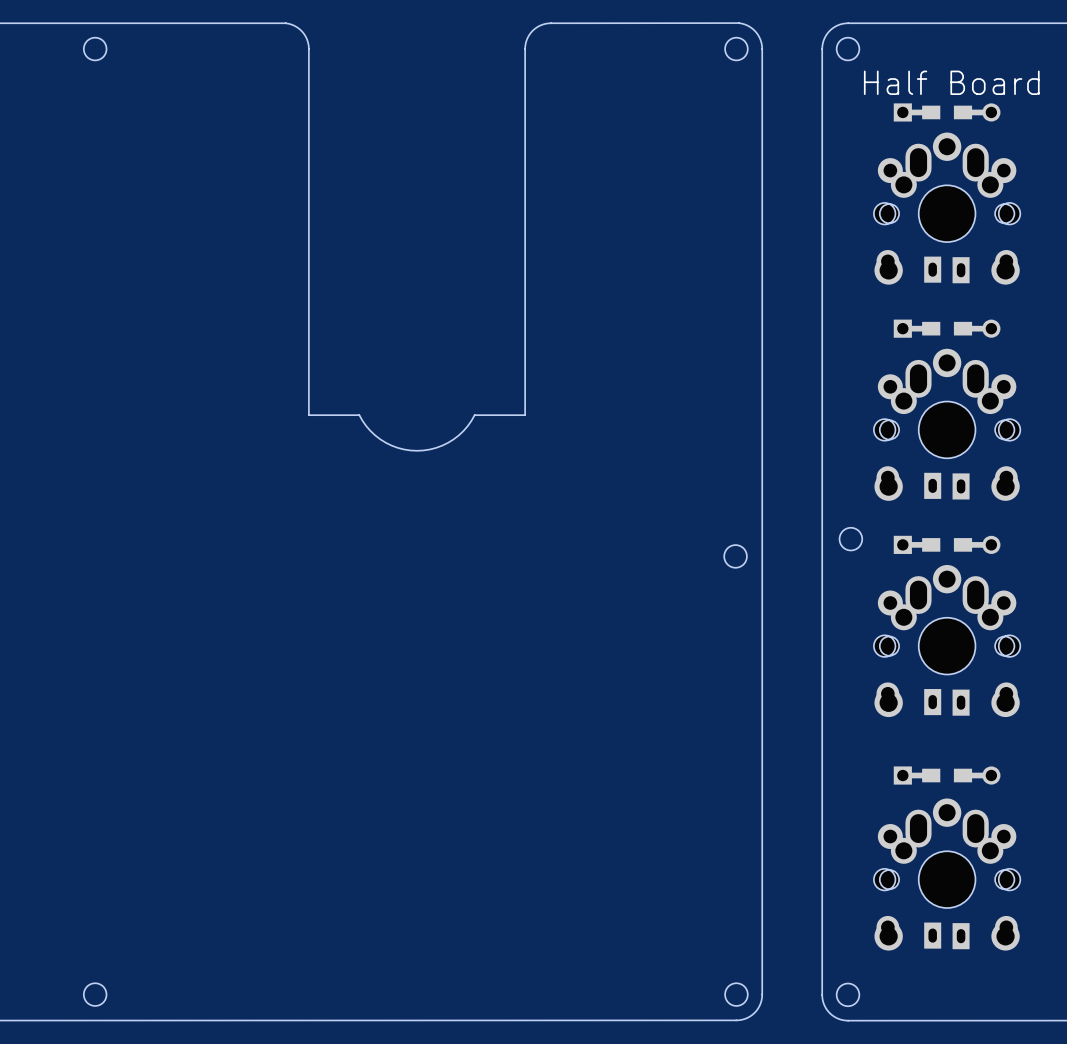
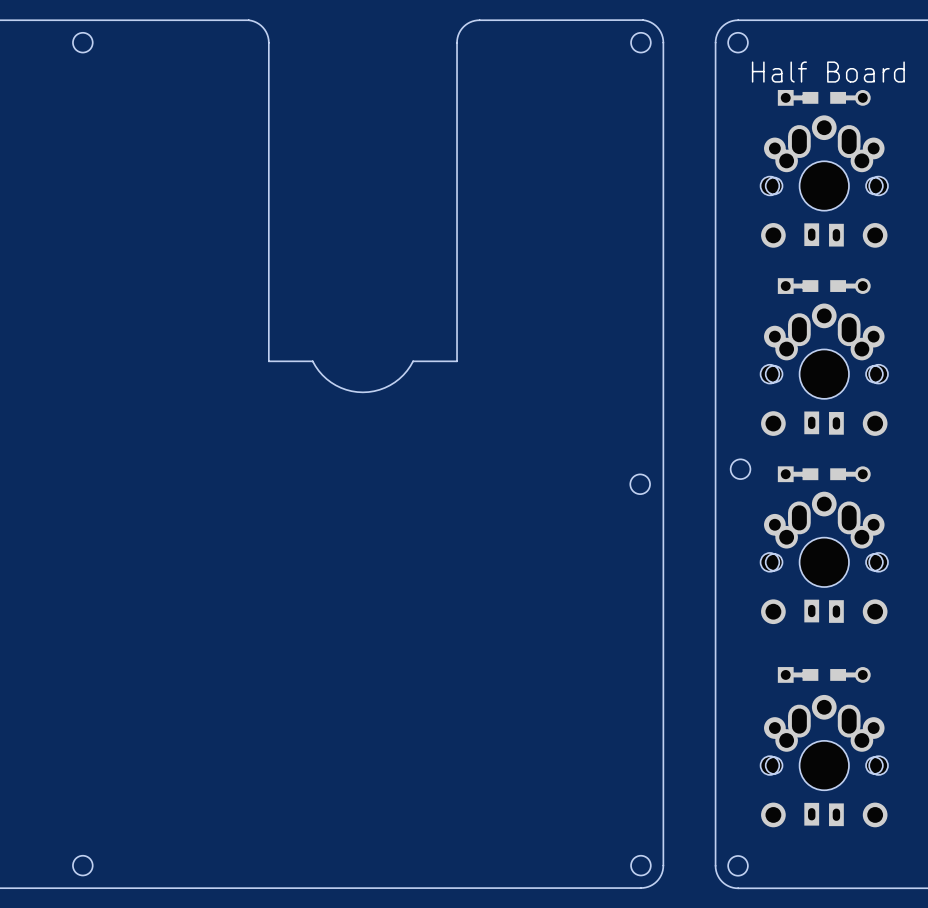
part footprint: [873, 132, 1021, 285] -> [760, 115, 888, 248]
part footprint: [873, 348, 1021, 501] -> [760, 303, 888, 436]
part footprint: [873, 564, 1021, 718] -> [760, 491, 888, 625]
part footprint: [873, 798, 1021, 951] -> [760, 694, 888, 828]

